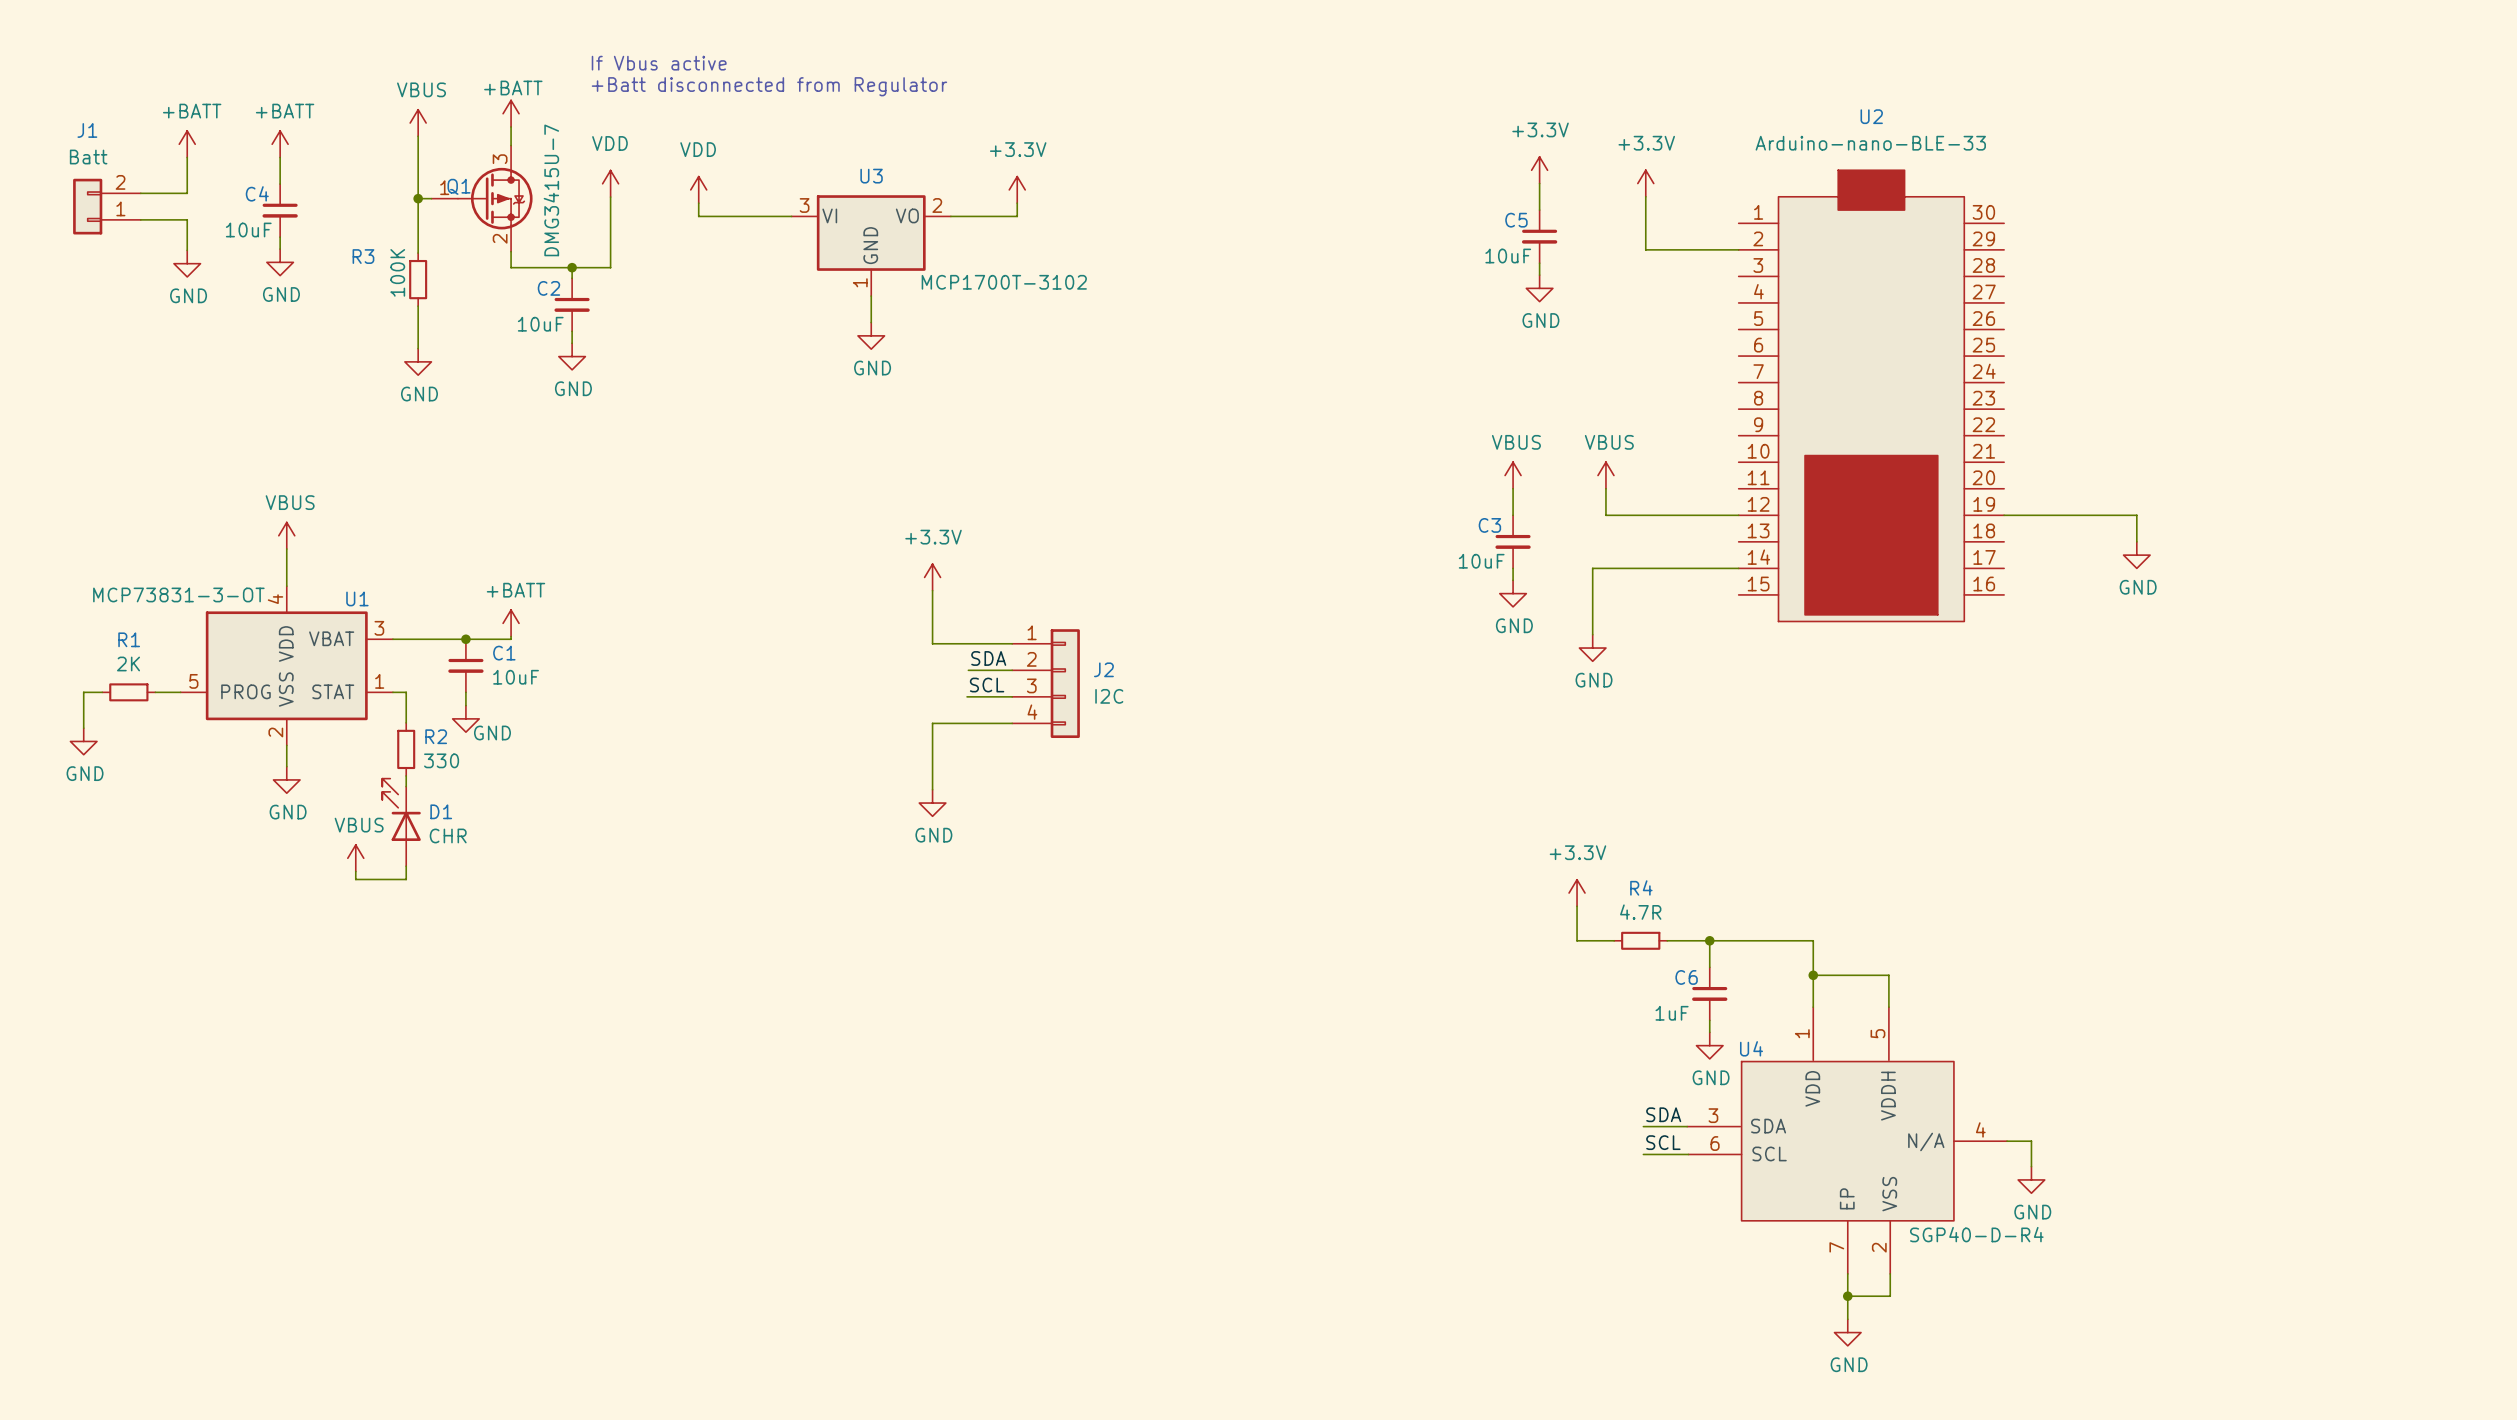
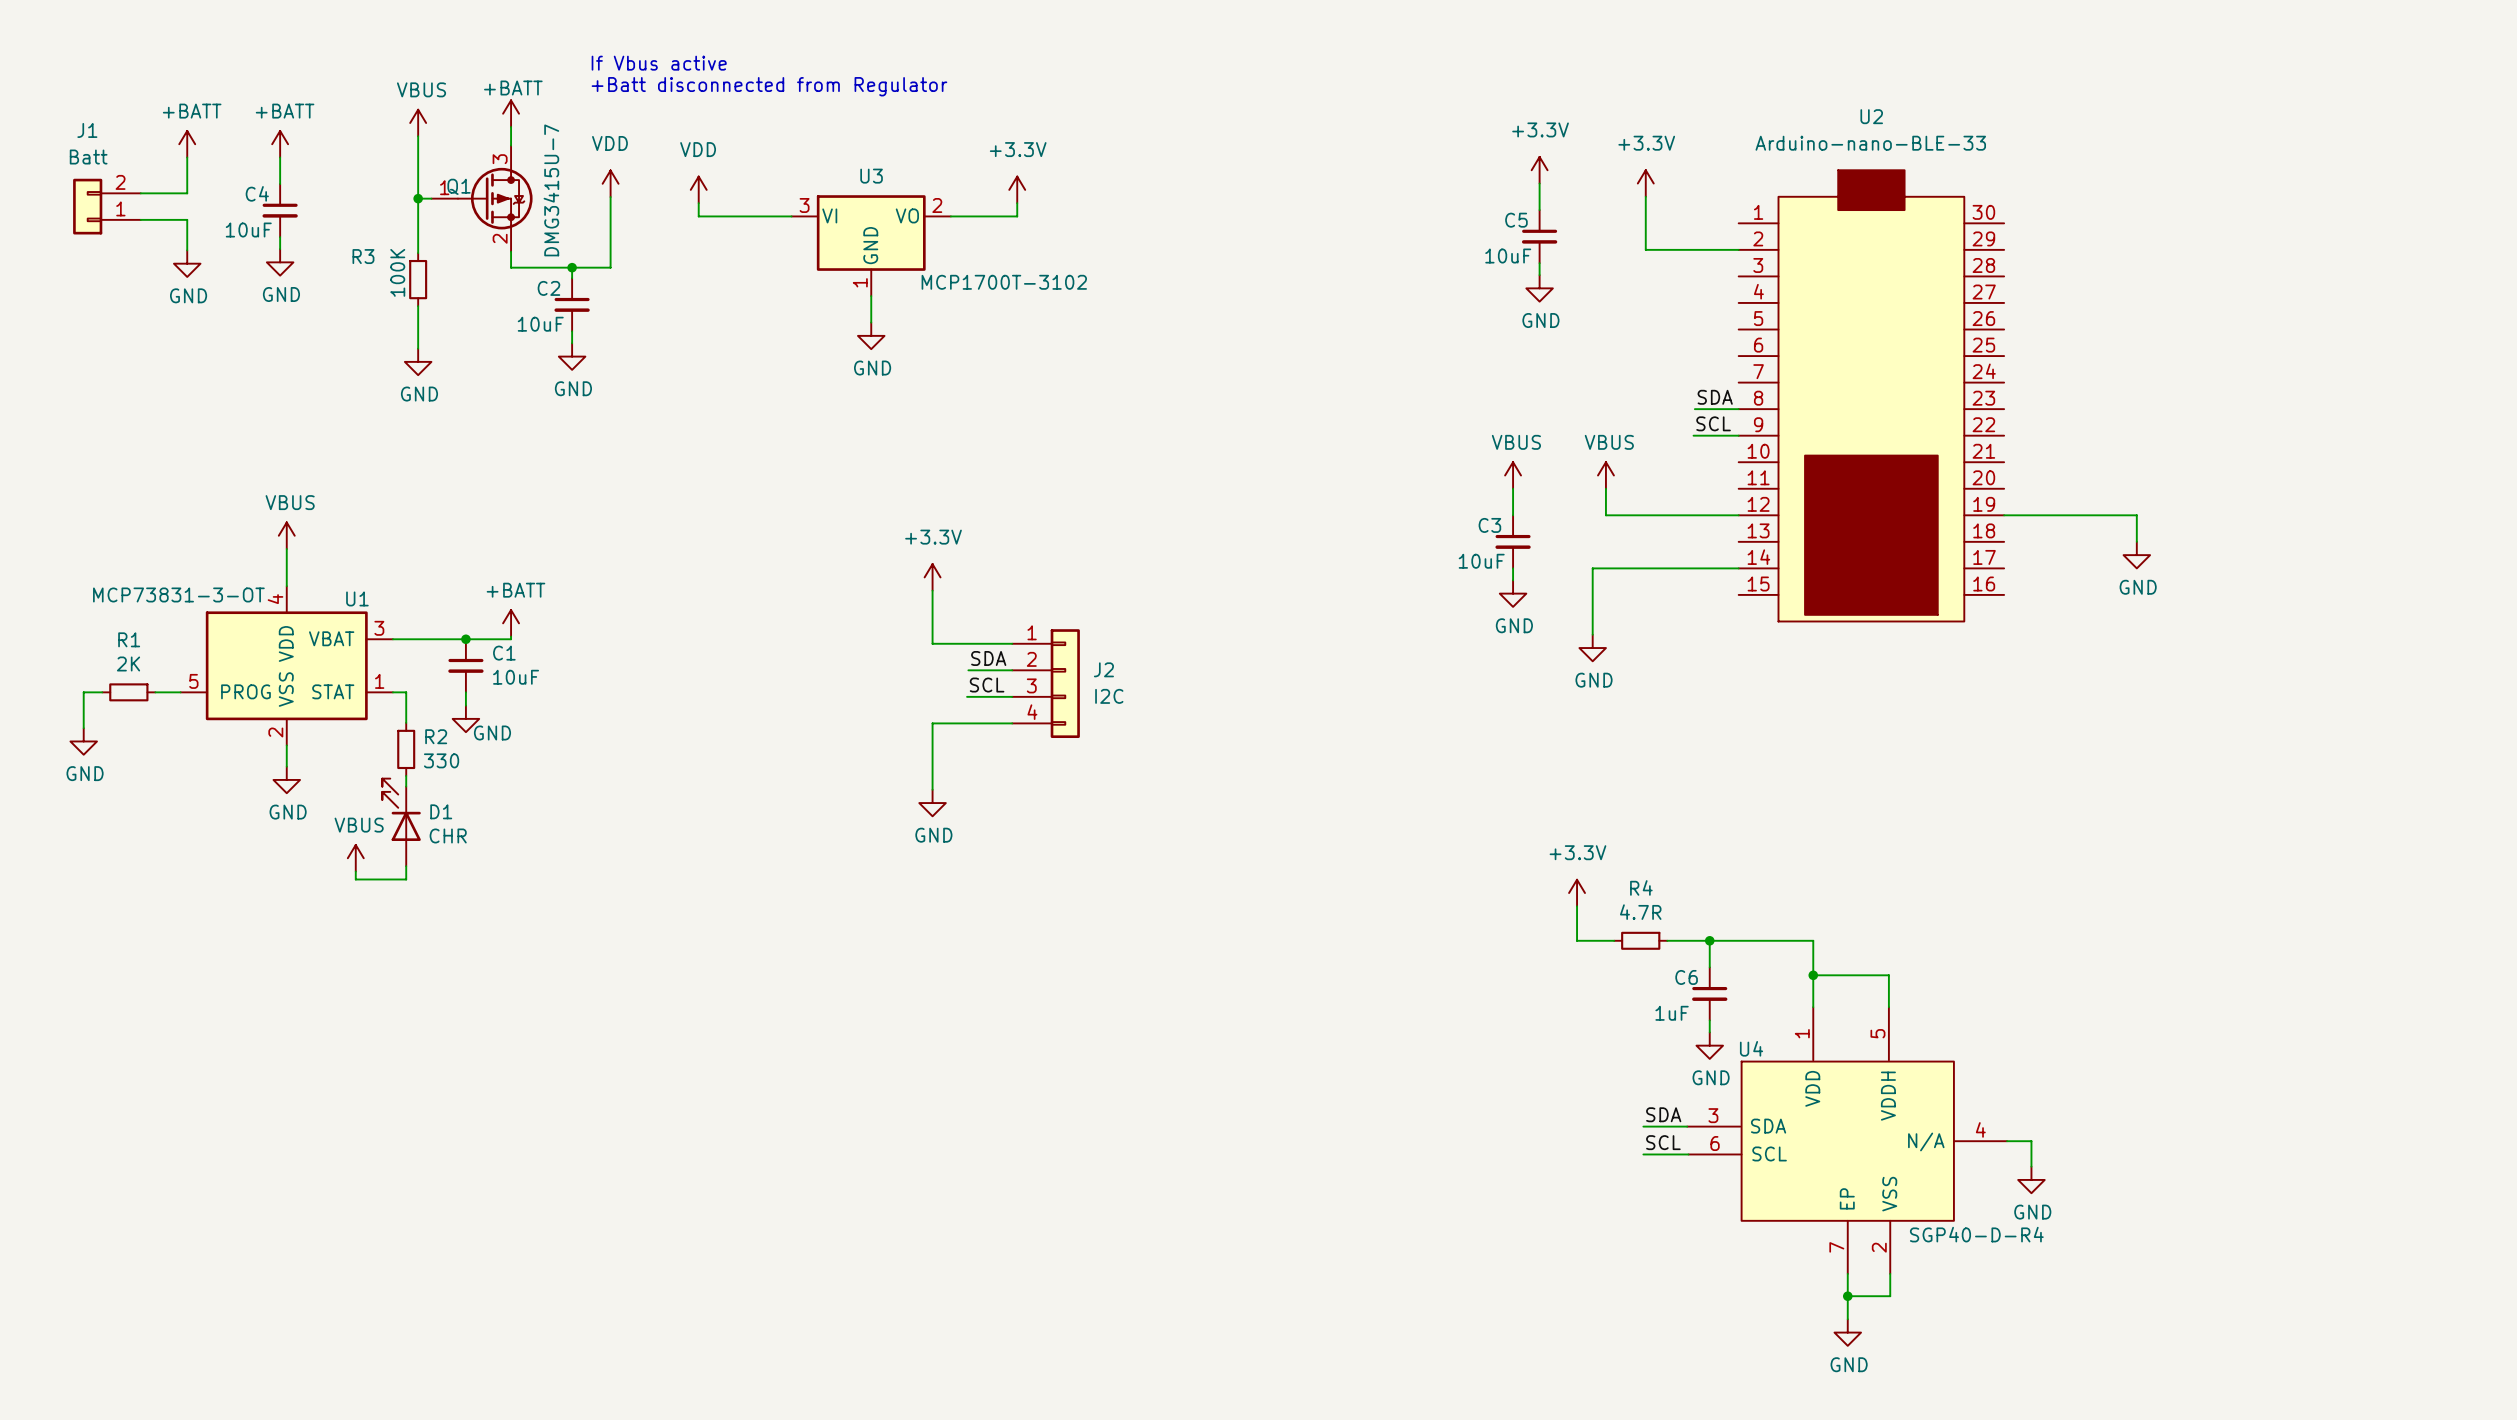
label: none -> SDA (1715, 397)
wire: none -> (1694, 409) (1738, 409)
label: none -> SCL (1713, 423)
wire: none -> (1693, 435) (1738, 435)

